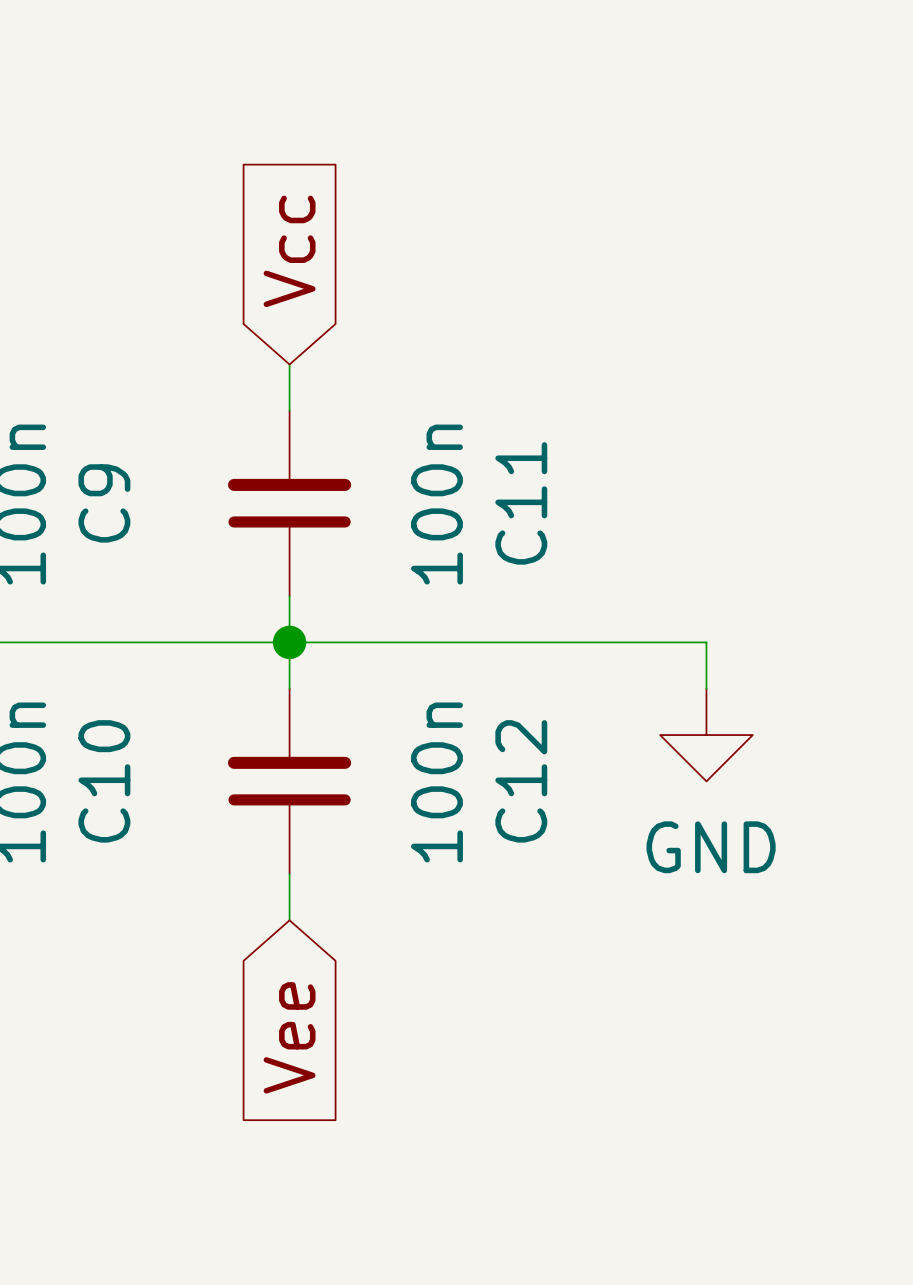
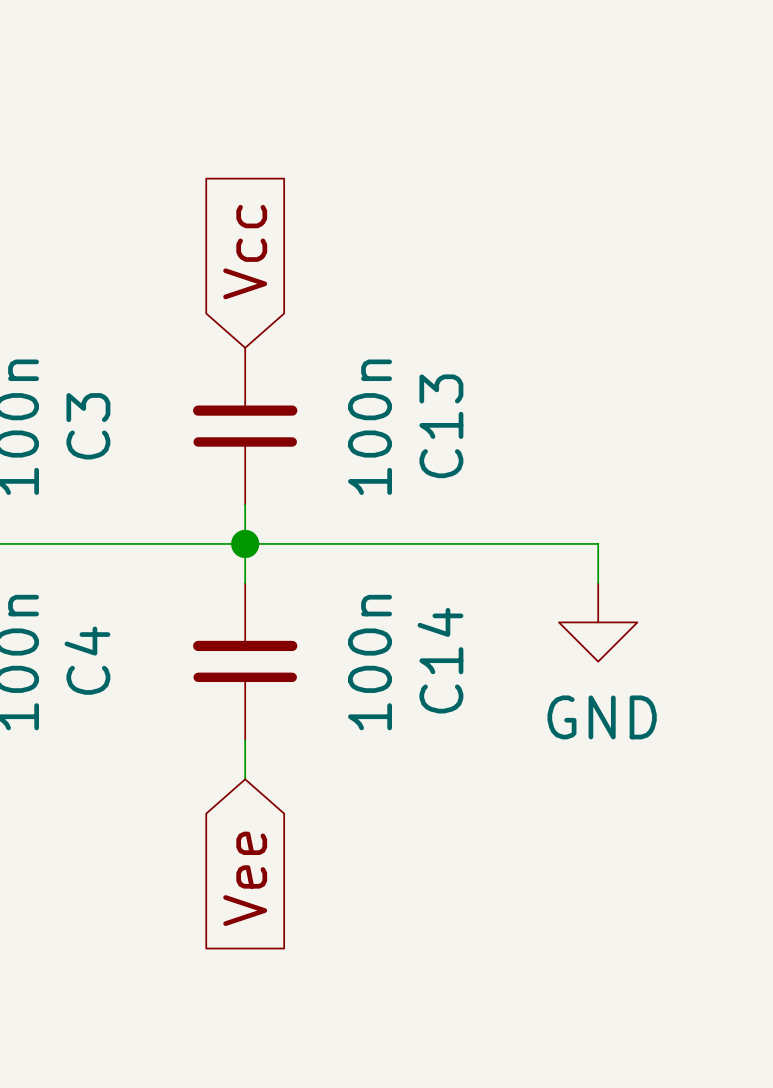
global label position: Vcc (289, 251) -> Vcc (245, 252)
wire: (289, 364) (289, 410) -> none
C9 name: C9 (104, 503) -> C3 (88, 426)
C11 name: C11 (521, 503) -> C13 (441, 426)
C10 name: C10 (104, 781) -> C4 (87, 660)
C12 name: C12 (521, 781) -> C14 (440, 660)

